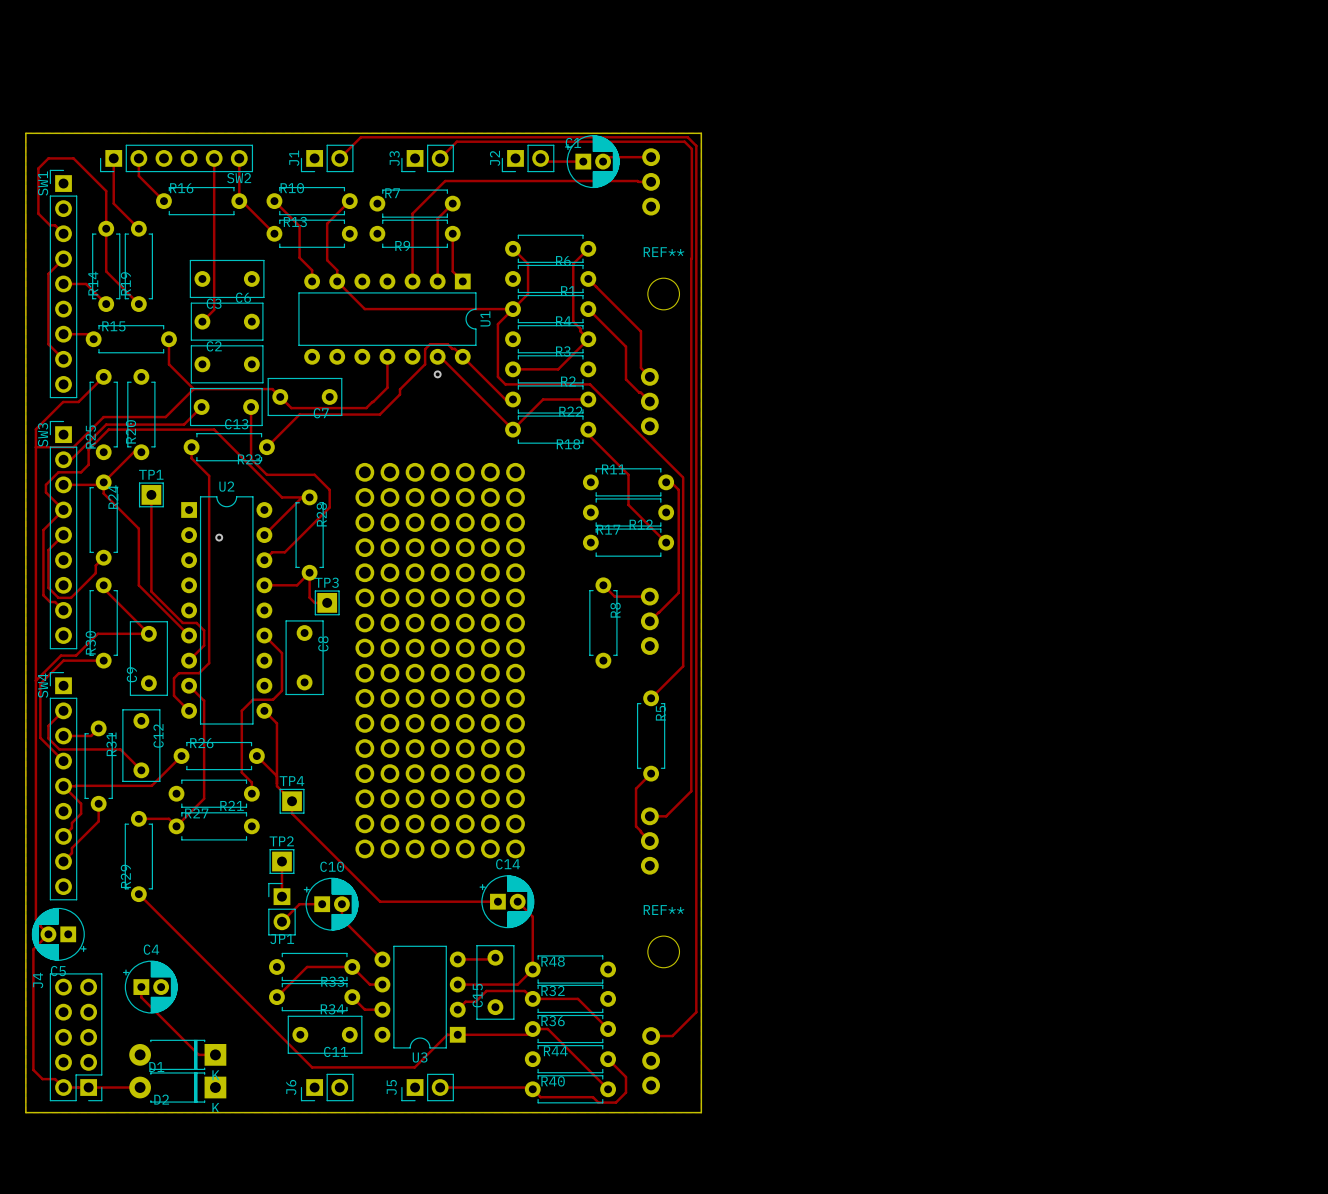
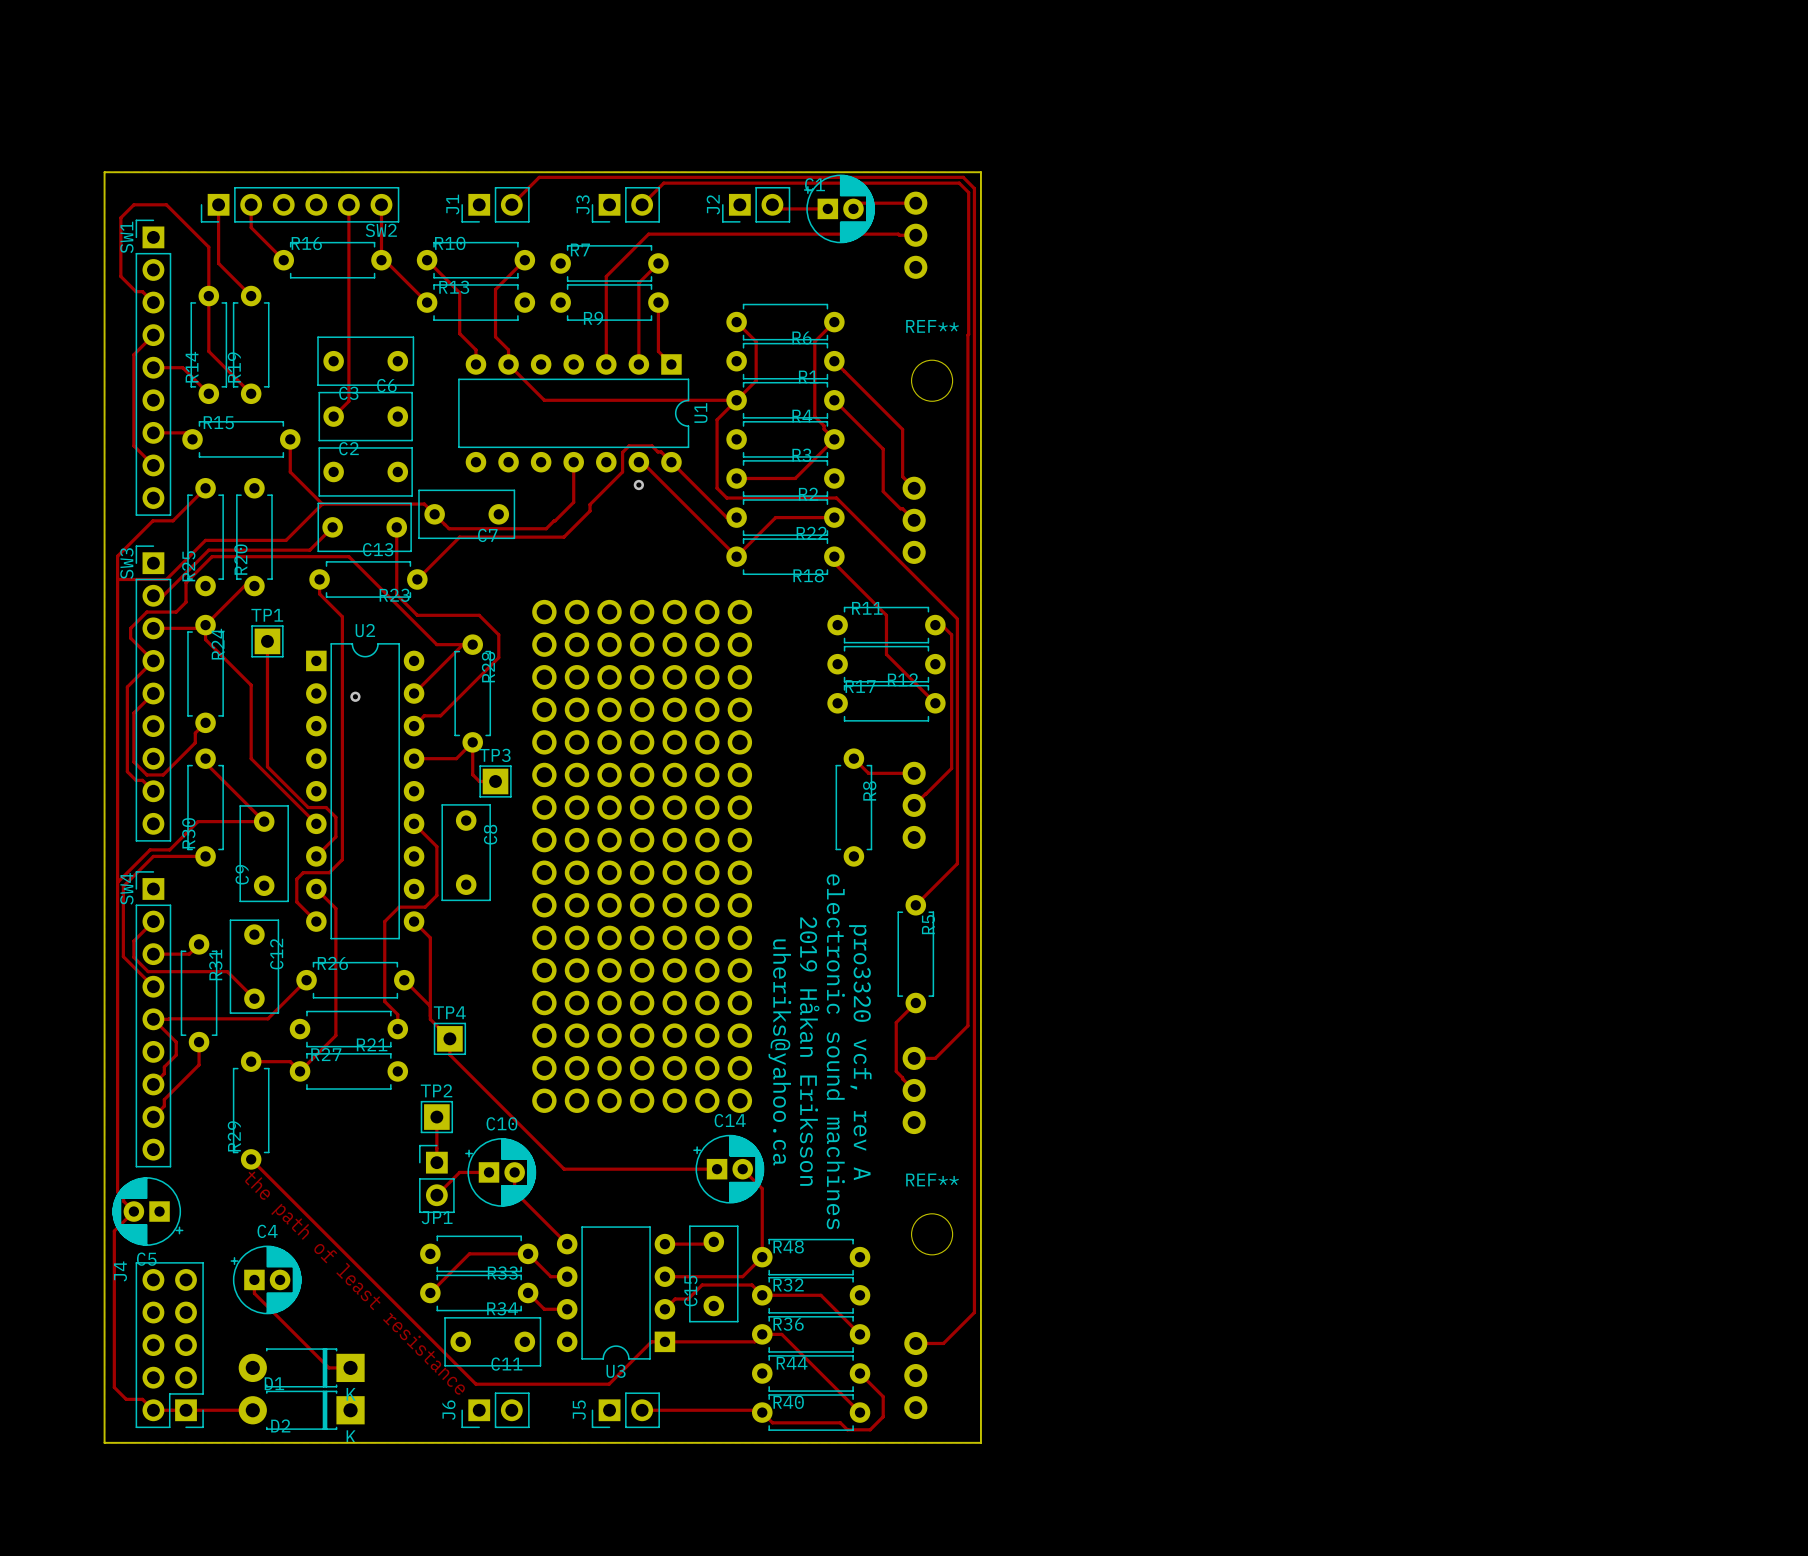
text: none -> uheriks@yahoo.ca (779, 1052)
text: none -> 2019 Håkan Eriksson (809, 1051)
text: none -> electronic sound machines (835, 1051)
text: none -> pro3320 vcf, rev A (860, 1052)
text: none -> the path of least resistance (355, 1283)

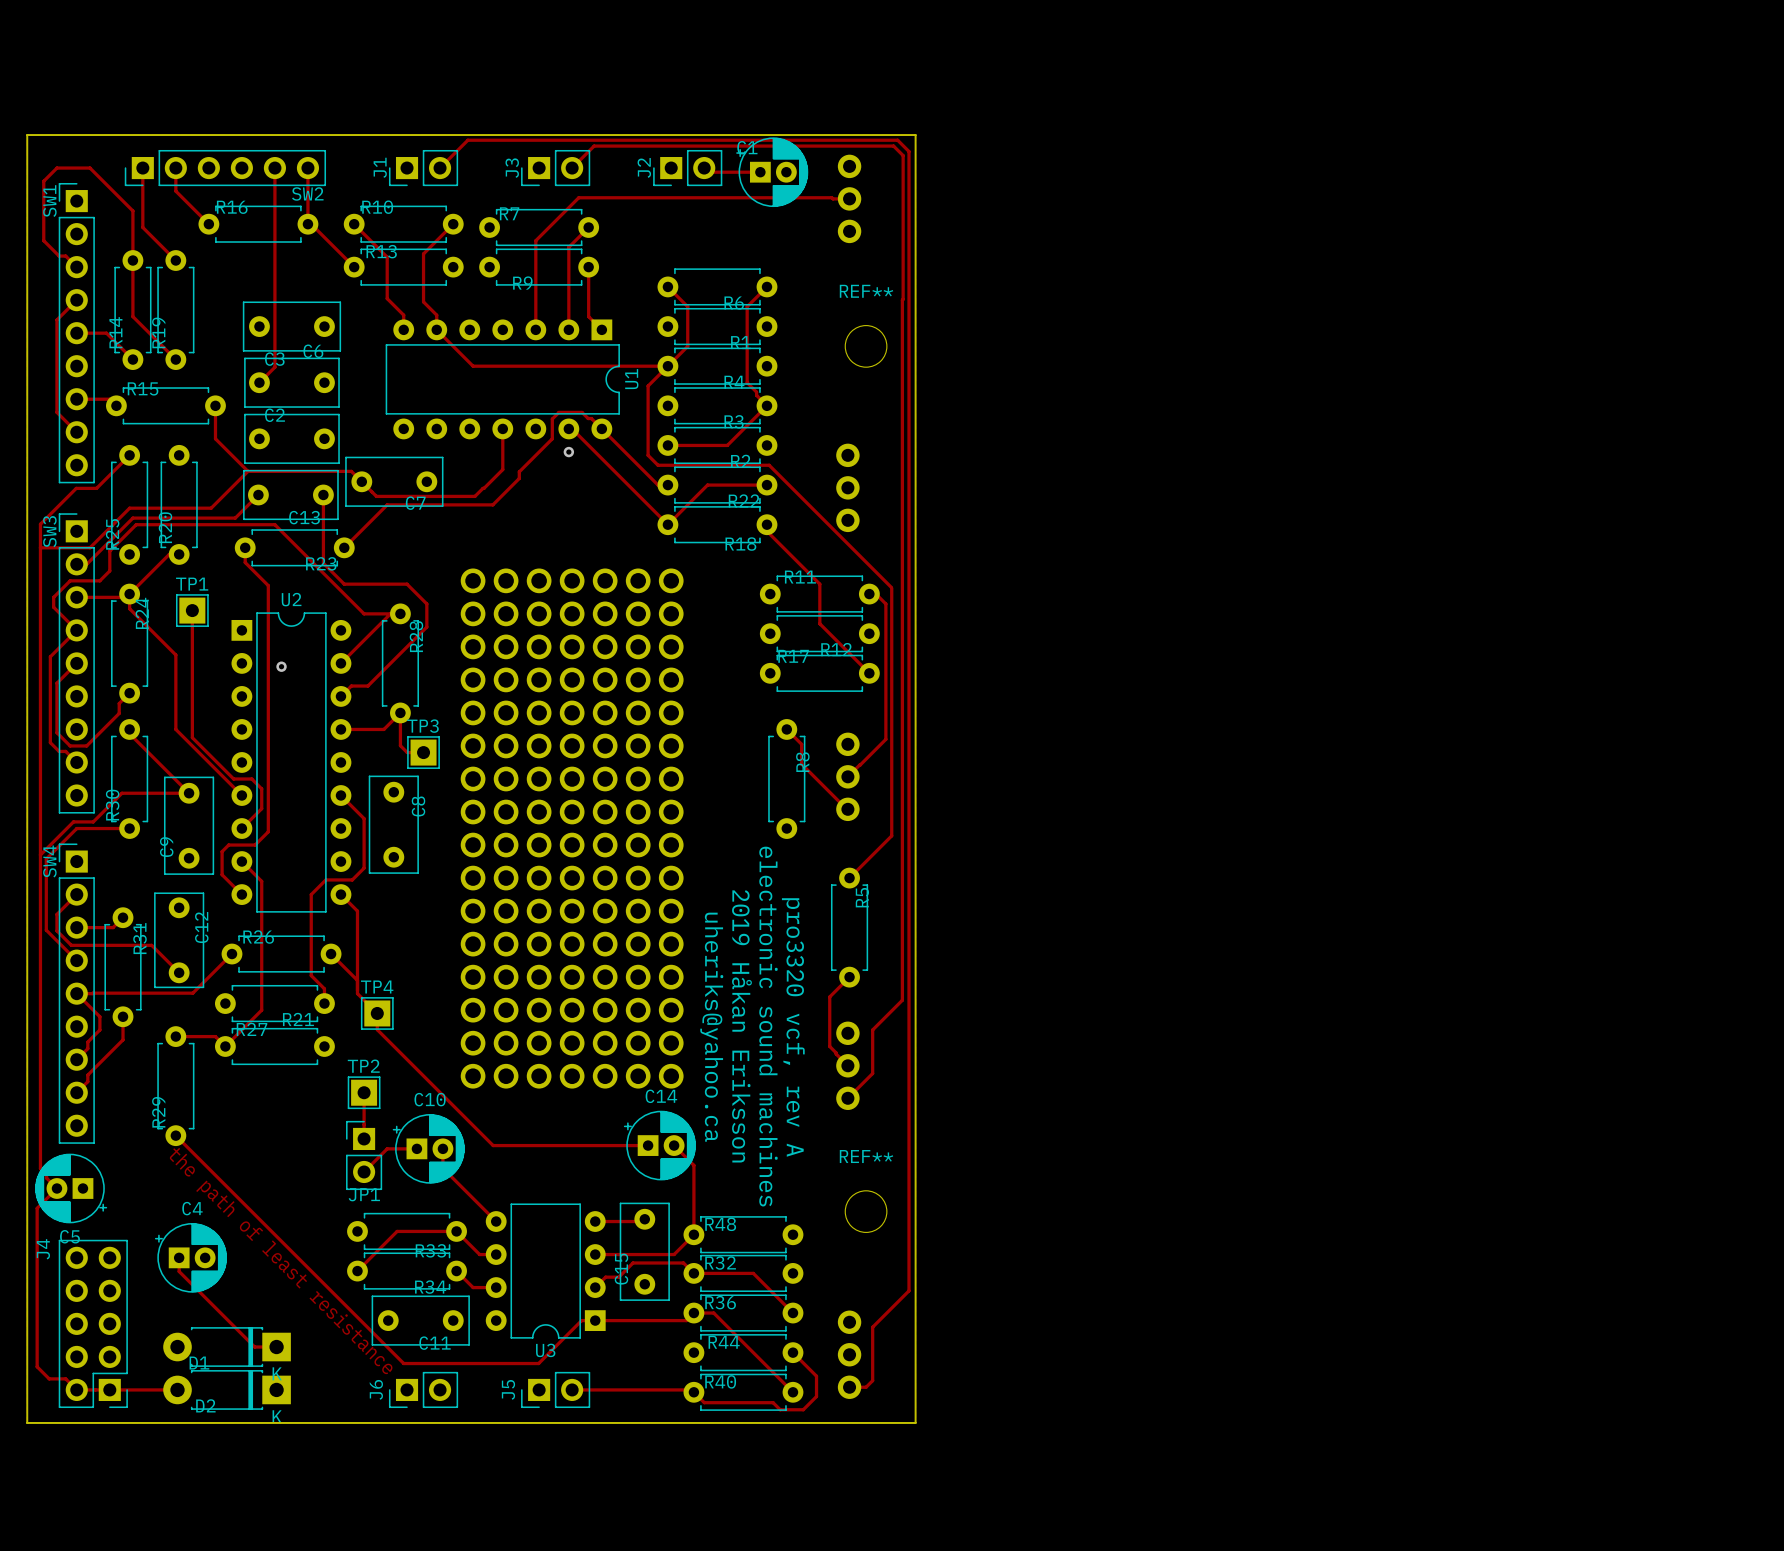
track: (859, 203) (915, 203) -> none
track: (834, 361) (902, 429) (902, 476) (914, 488) -> none
track: (834, 400) (883, 449) (883, 491) (914, 520) -> none
track: (868, 773) (914, 773) -> (801, 744) (801, 764) (847, 810)
track: (938, 1055) (935, 1058) (914, 1058) -> (872, 1029) (872, 1073) (847, 1098)
track: (915, 1343) (943, 1343) -> (849, 1387) (866, 1387) (872, 1380) (872, 1327) (877, 1322)

